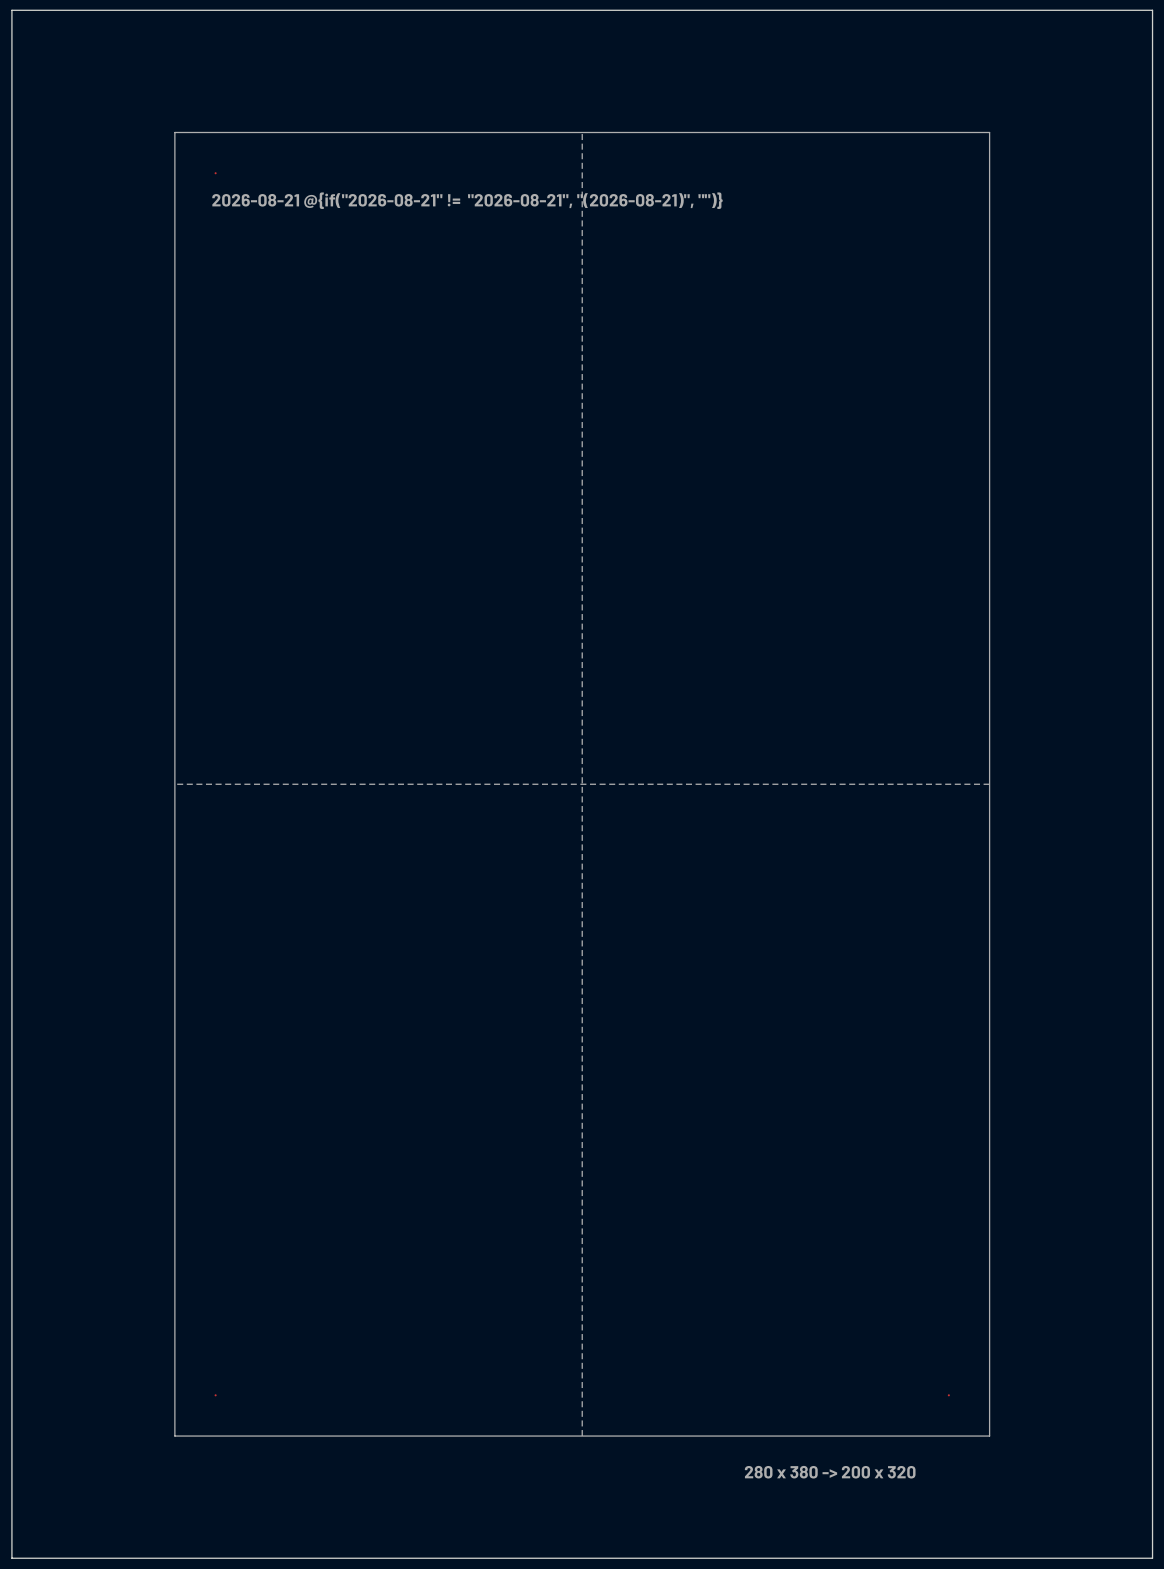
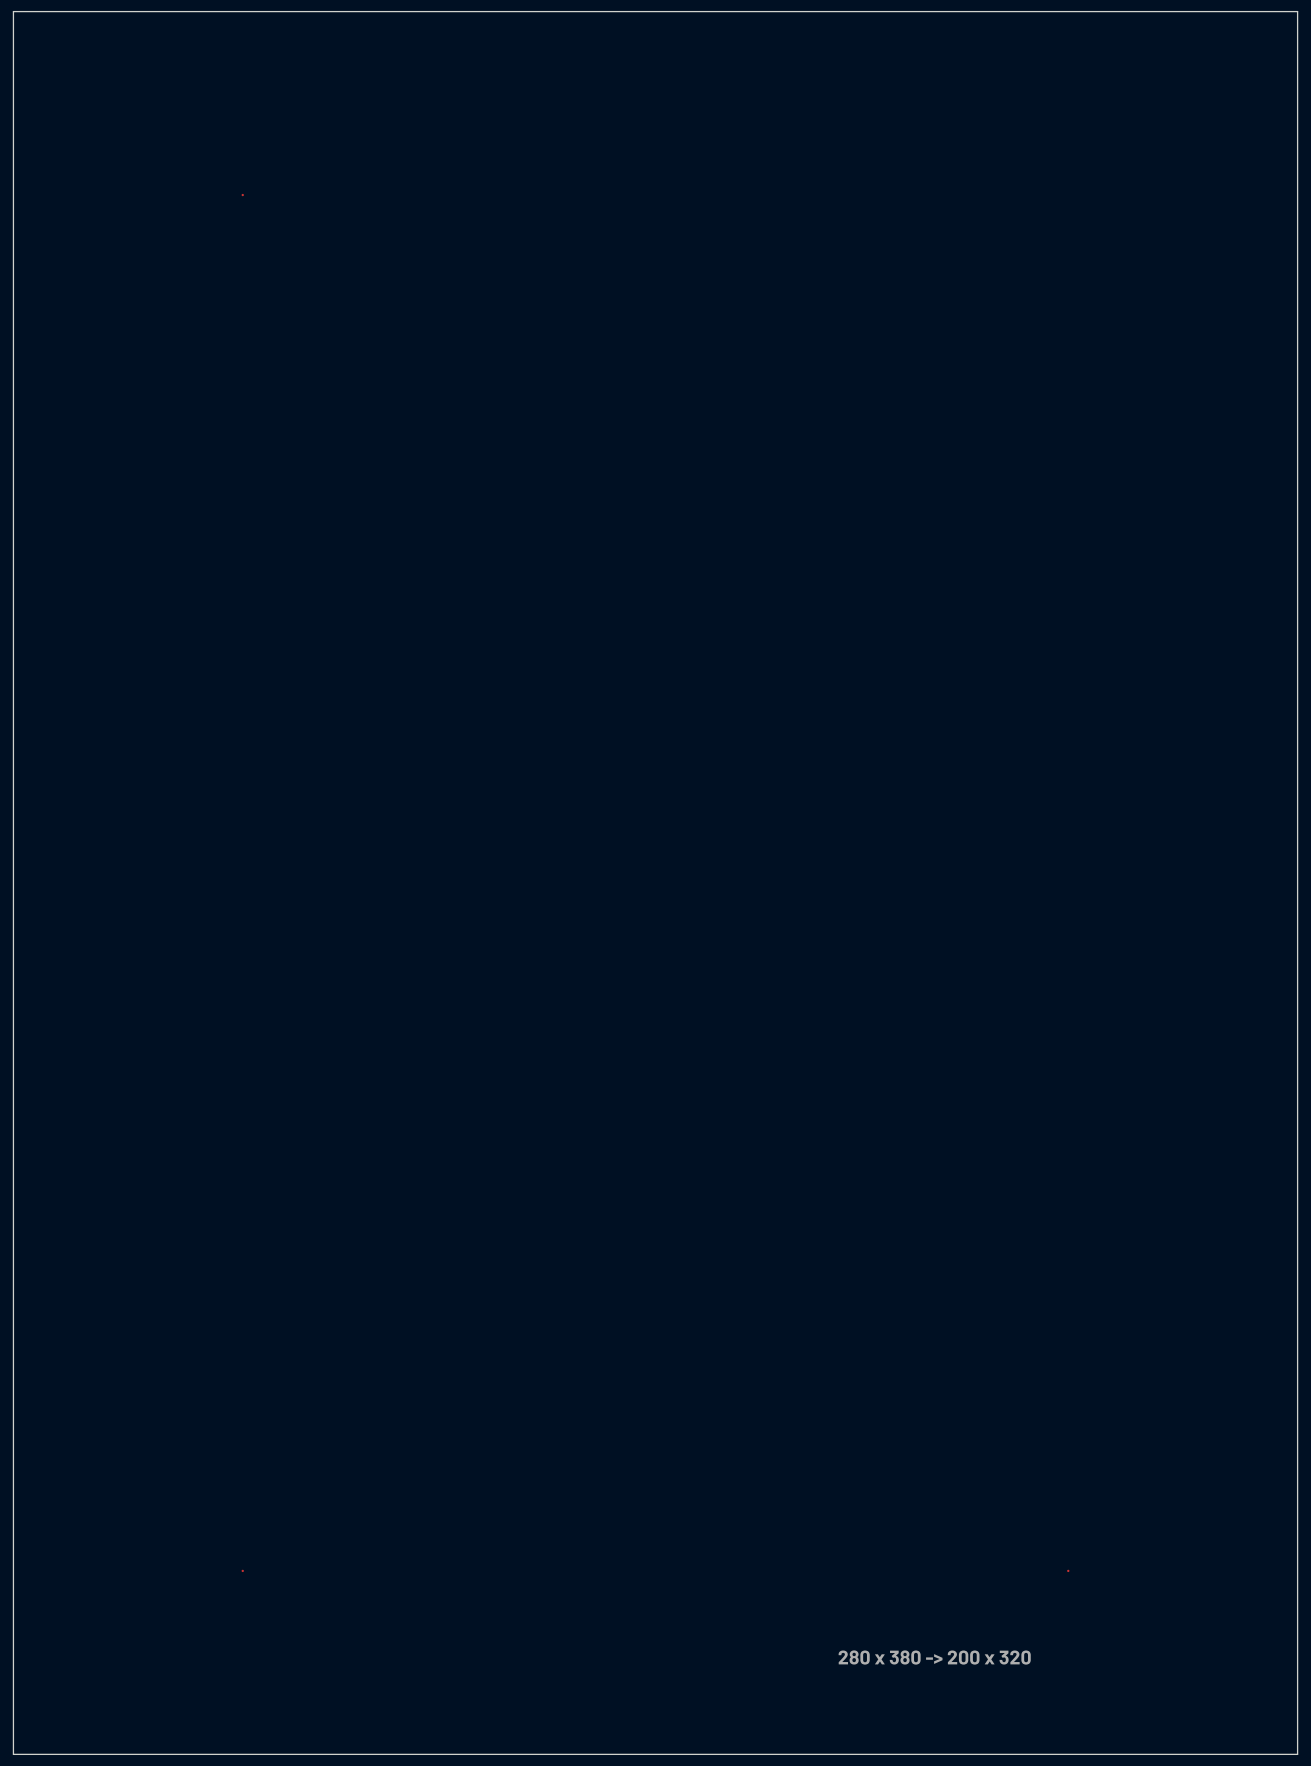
line: (174, 132) (989, 132) (989, 1436) (174, 1436) (174, 132) -> none
line: (582, 132) (582, 1436) -> none
text: 2026-08-21 @{if("2026-08-21" != "2026-08-21", "(2026-08-21)", "")} (467, 200) -> none
line: (174, 784) (989, 784) -> none

